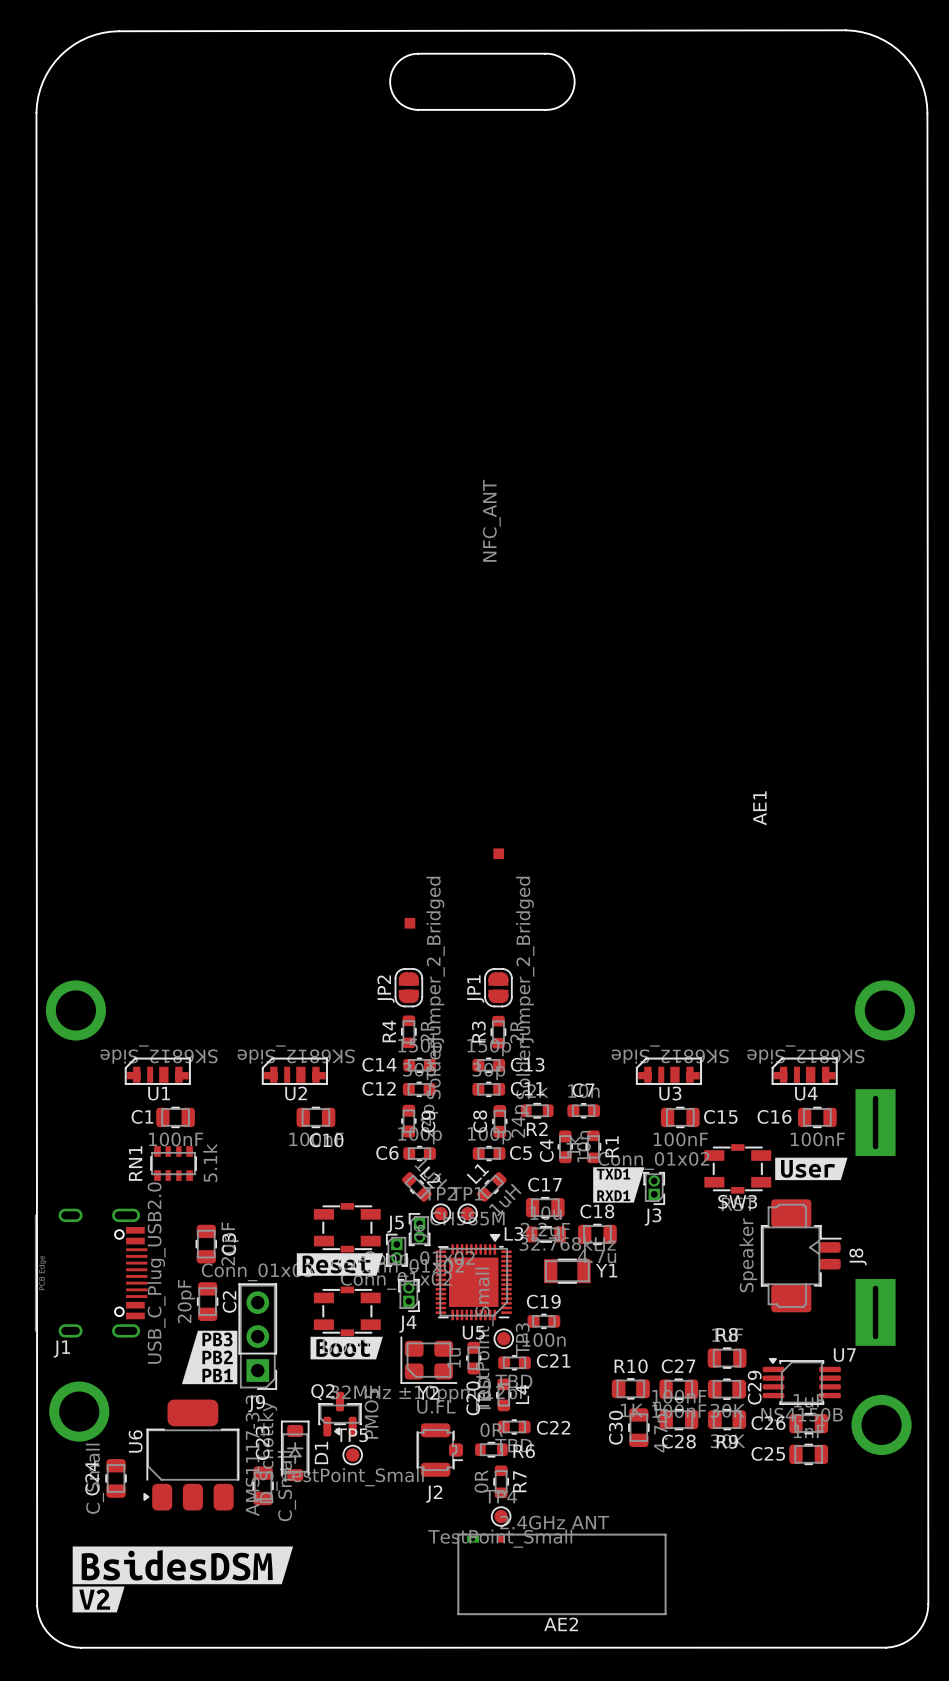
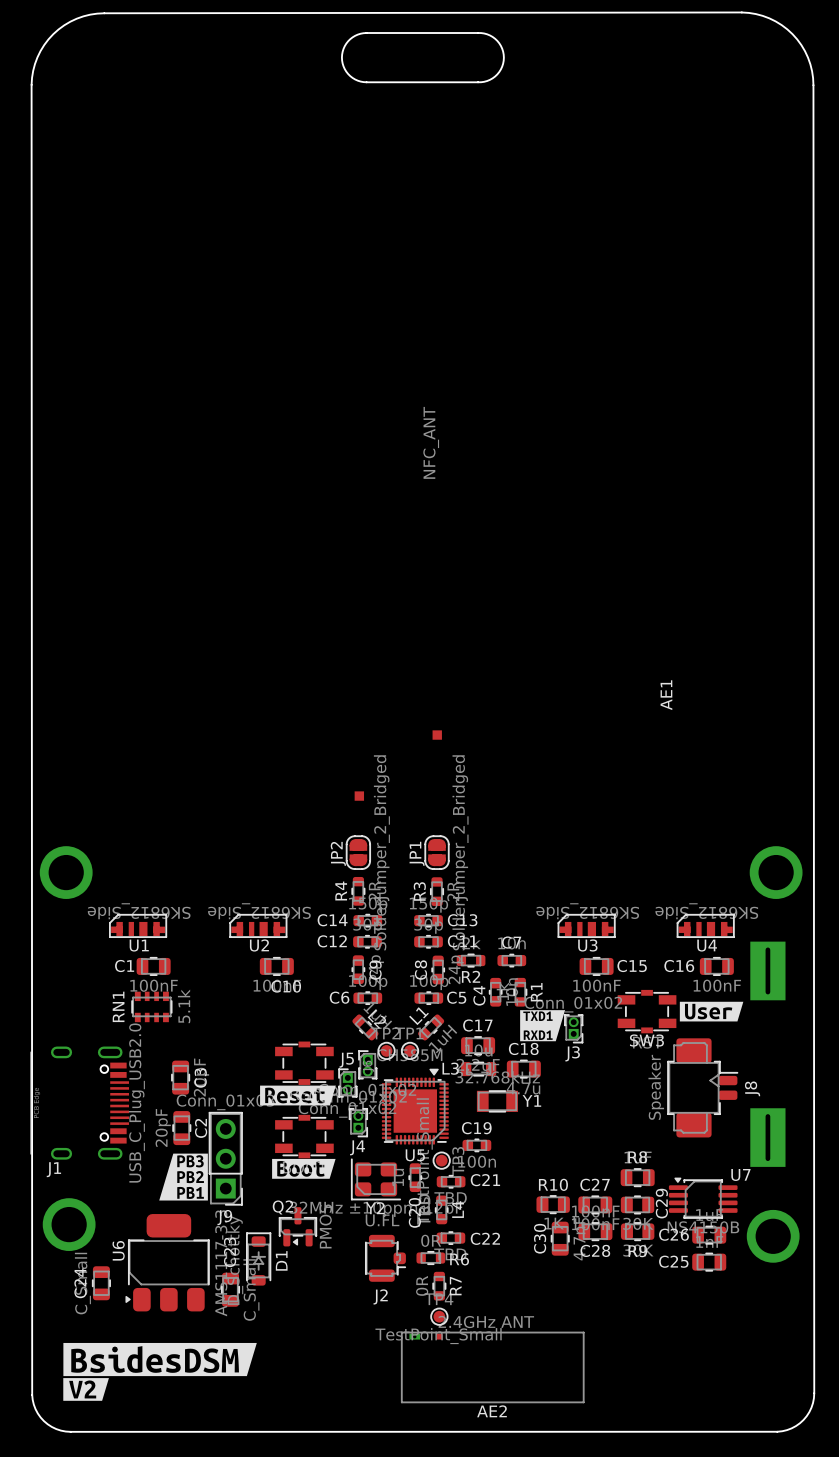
TP5: TestPoint_Small (352, 1455) -> none

